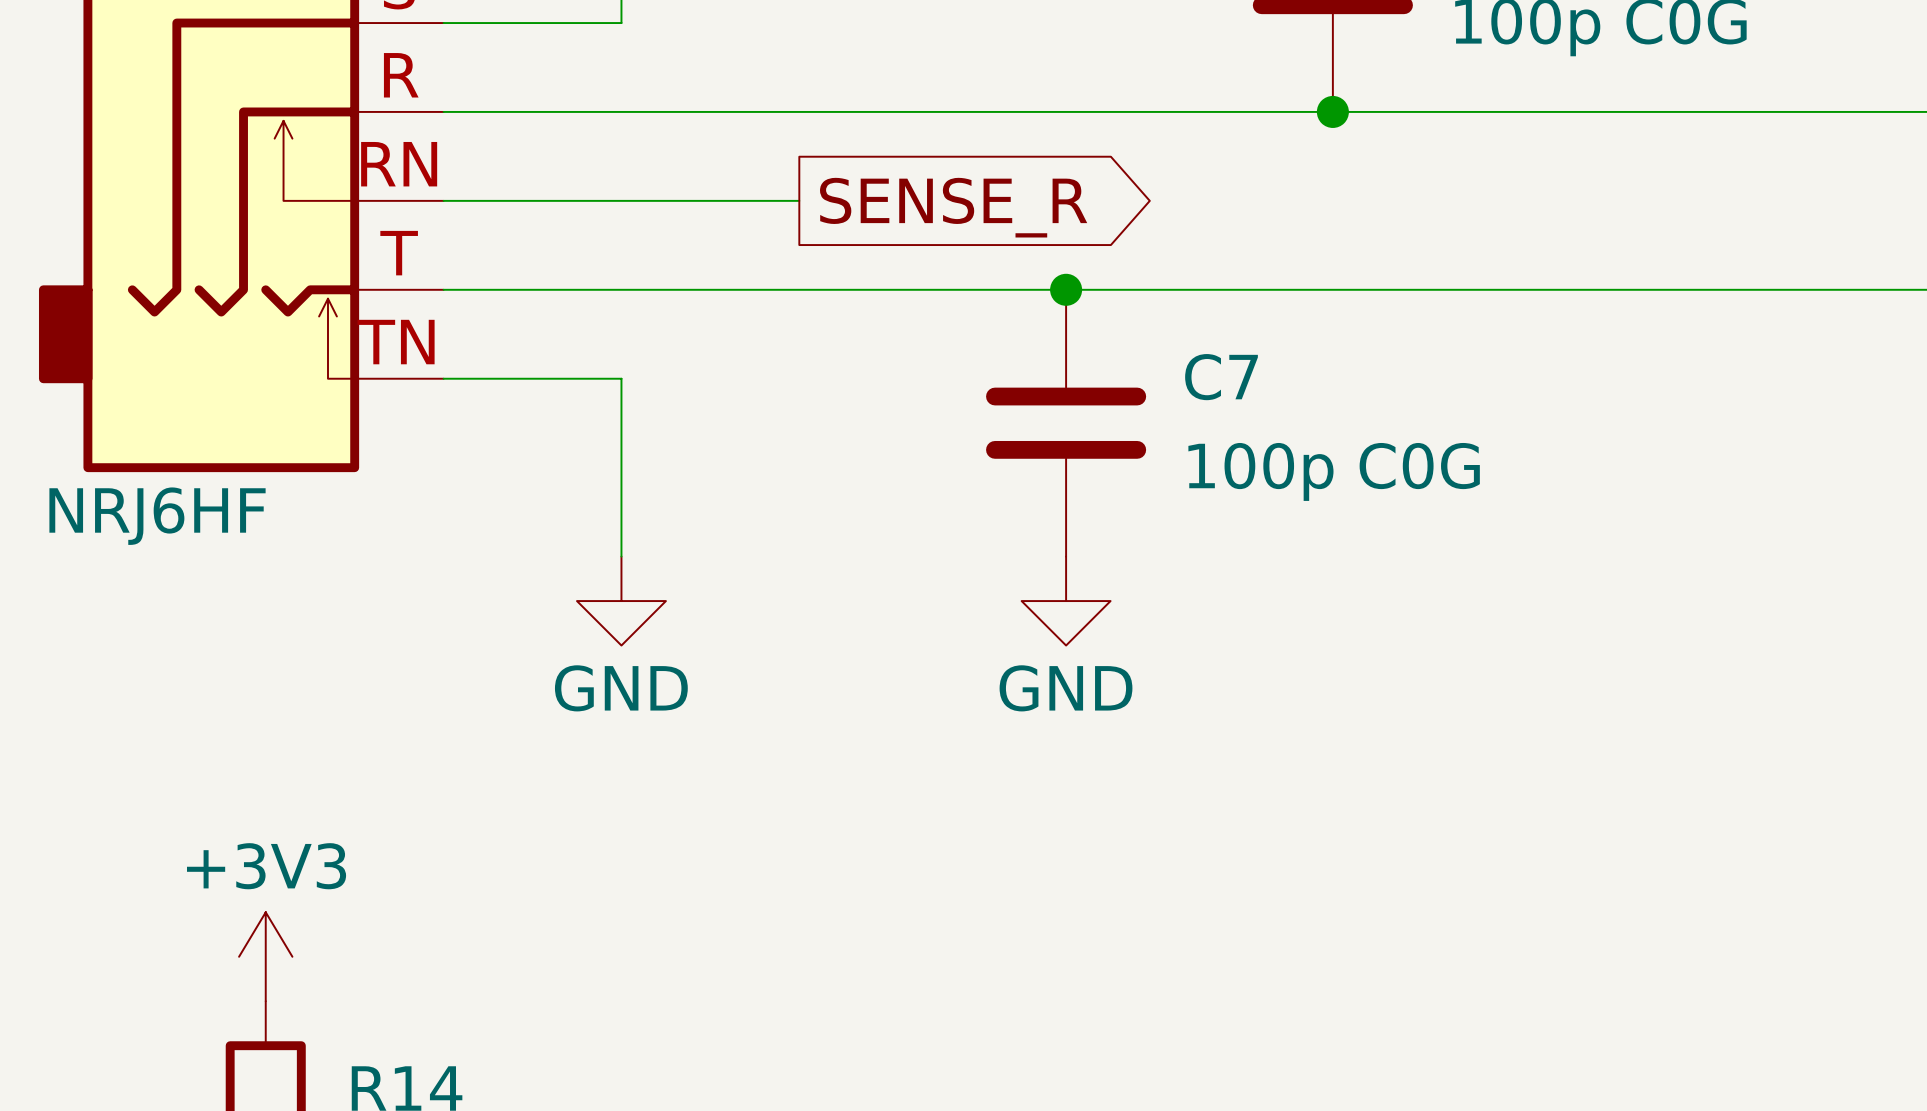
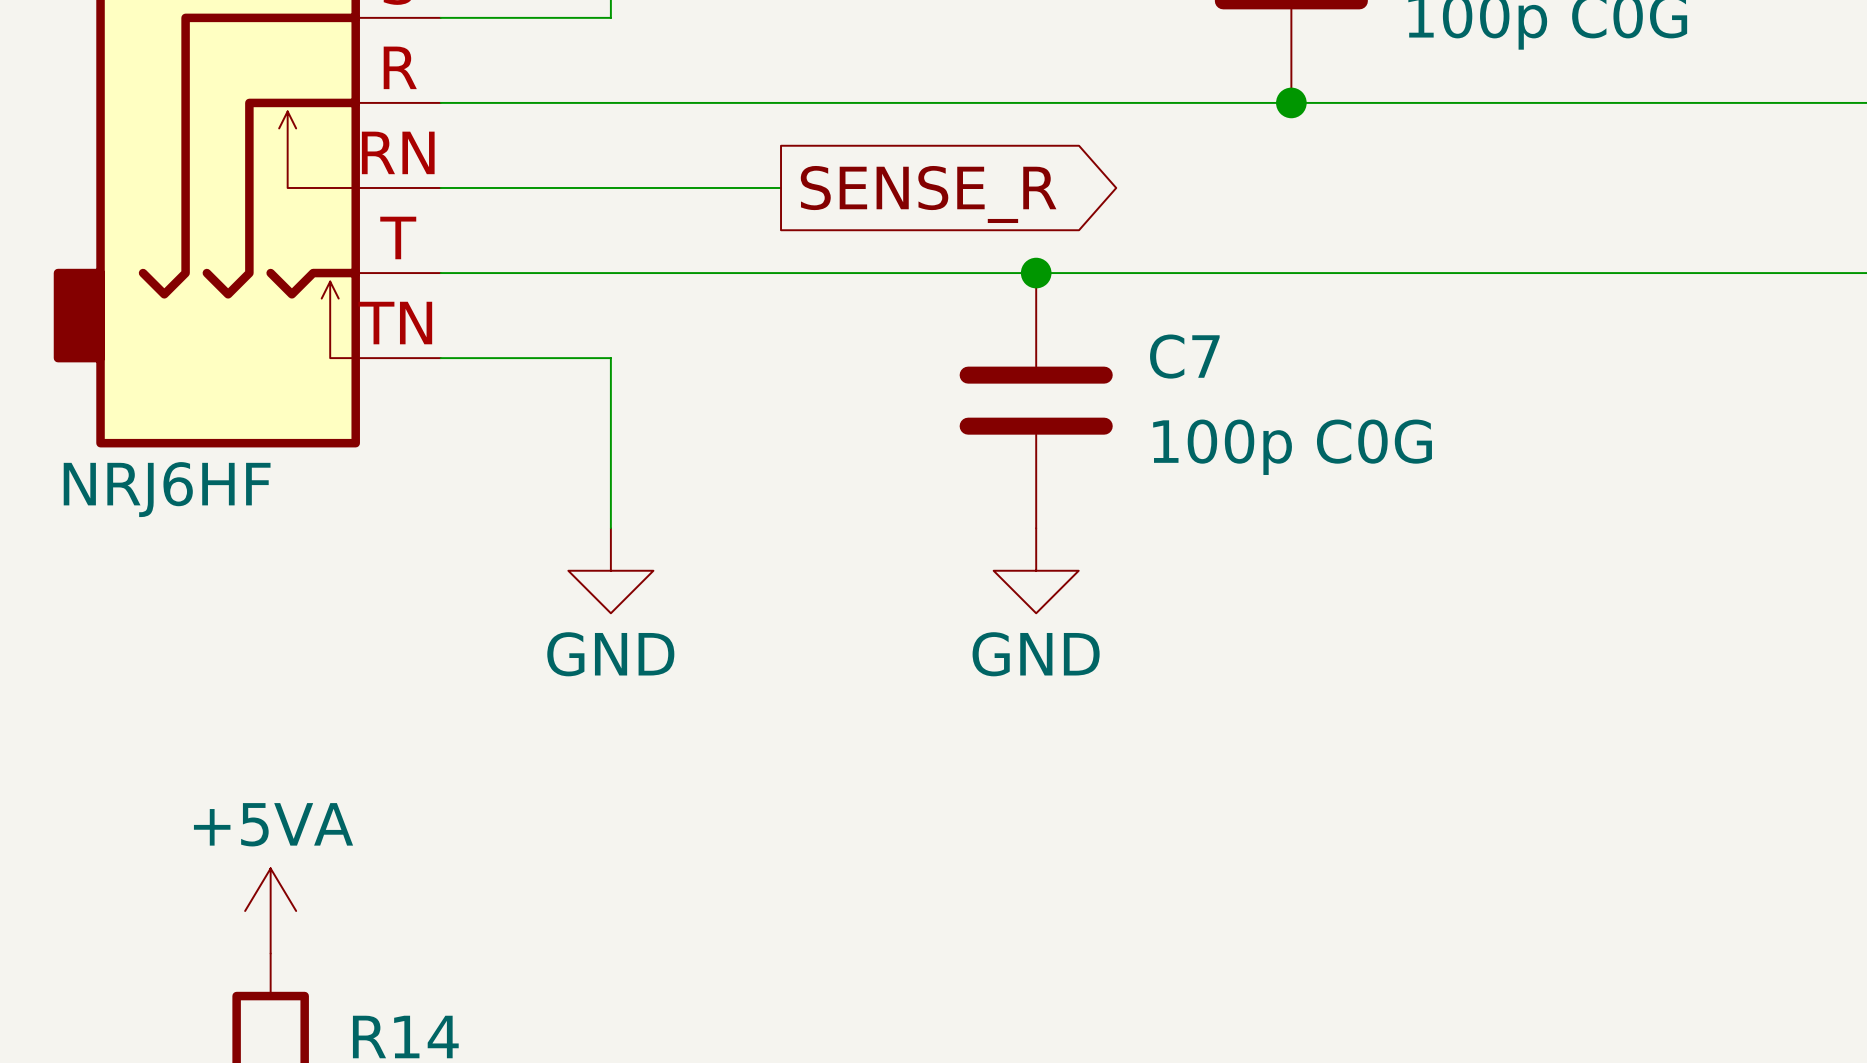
power symbol: +3V3 (265, 956) -> +5VA (270, 911)

